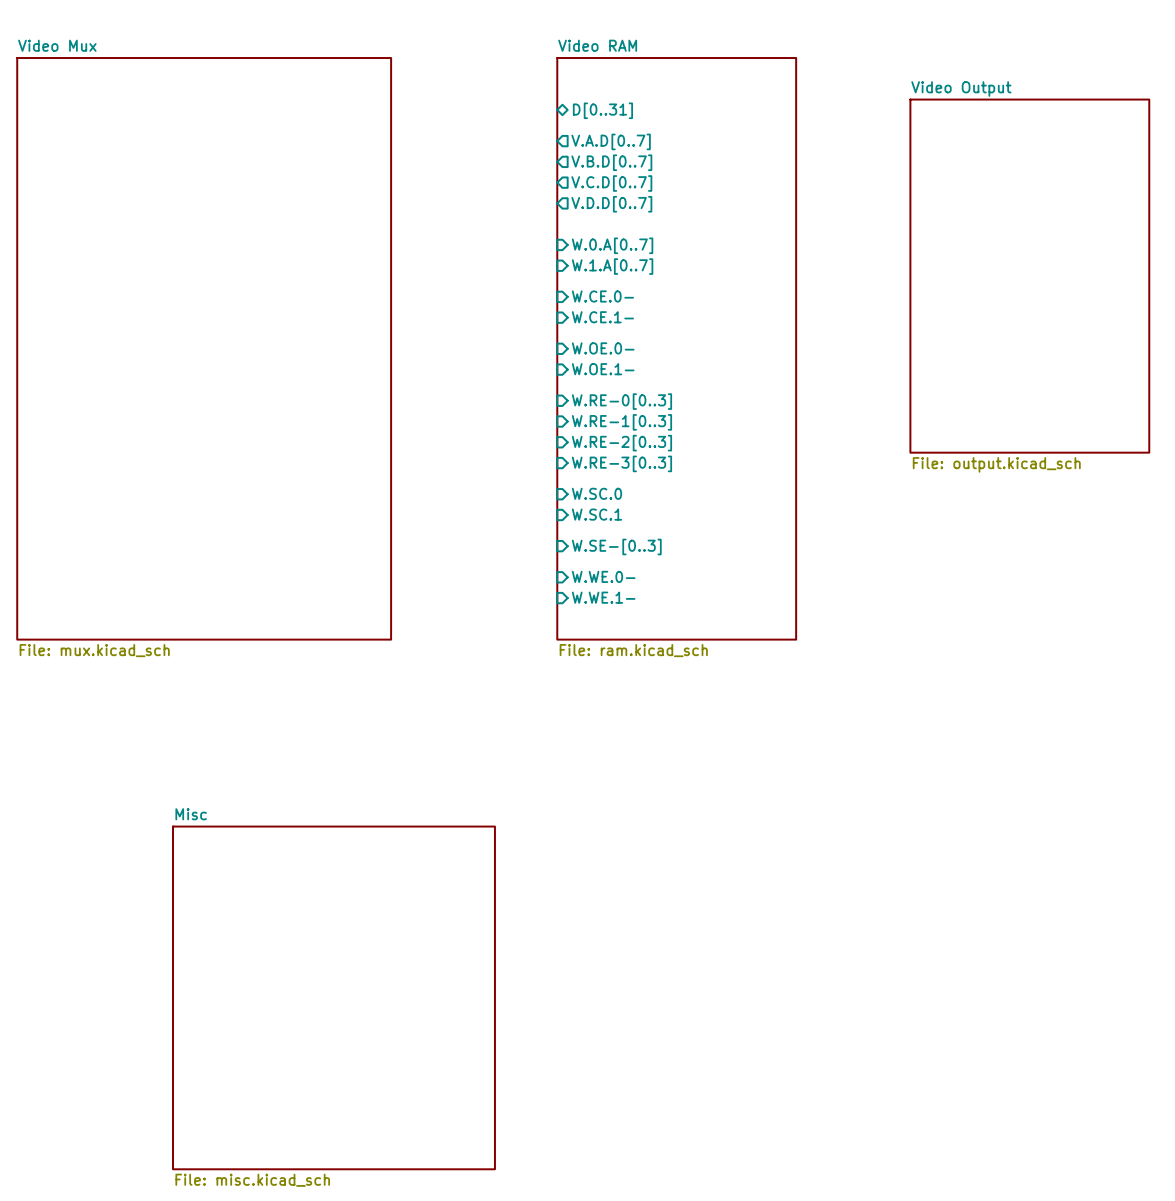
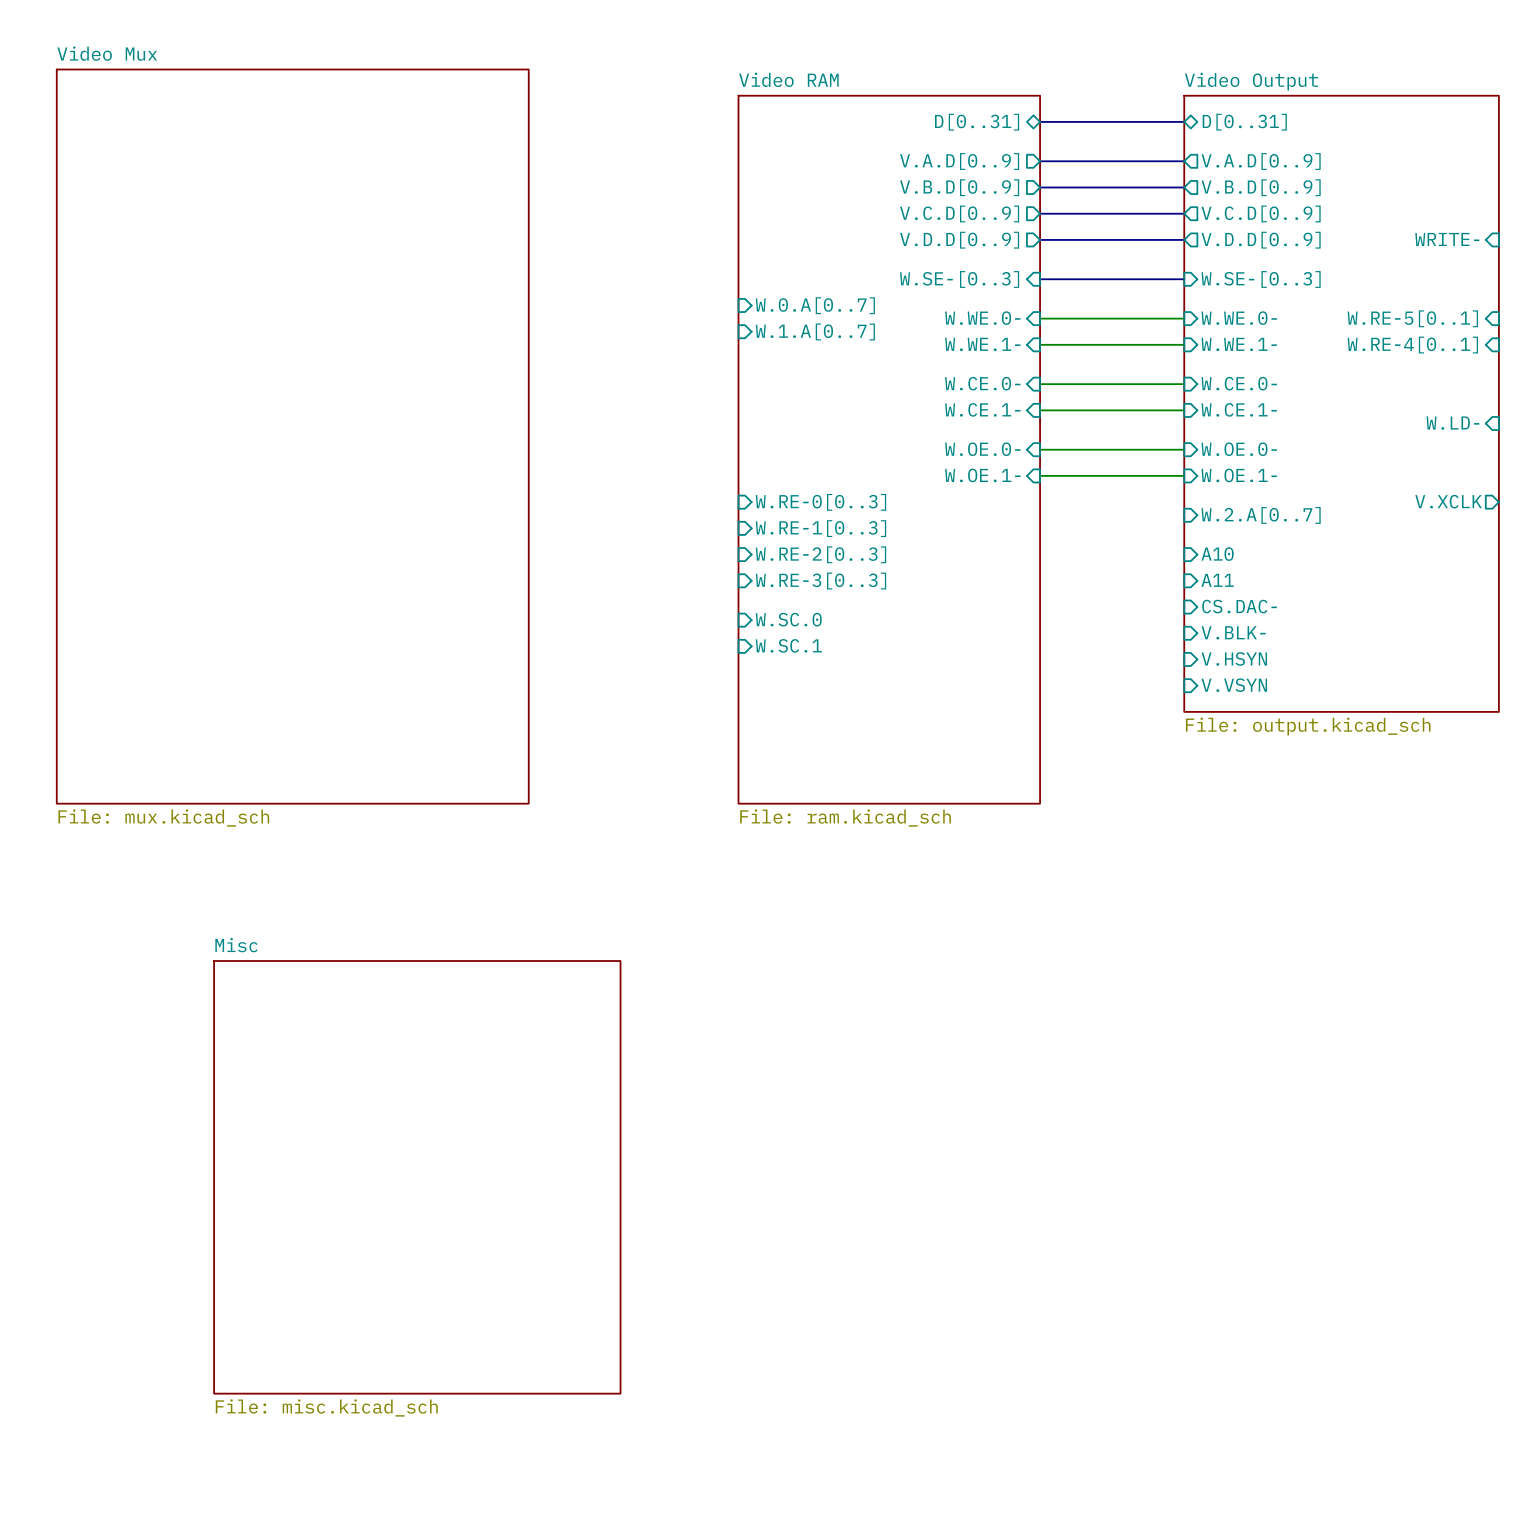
bus: none -> (1040, 121) (1184, 121)
sheet pin: none -> D[0..31] (977, 122)
sheet pin: none -> D[0..31] (1244, 122)
sheet pin: D[0..31] (602, 110) -> none
bus: none -> (1040, 161) (1184, 161)
sheet pin: none -> V.A.D[0..9] (959, 161)
sheet pin: none -> V.A.D[0..9] (1261, 161)
sheet pin: V.A.D[0..7] (611, 141) -> none
bus: none -> (1040, 187) (1184, 187)
sheet pin: none -> V.B.D[0..9] (959, 187)
sheet pin: none -> V.B.D[0..9] (1261, 187)
sheet pin: V.B.D[0..7] (611, 162) -> none
bus: none -> (1040, 213) (1184, 213)
sheet pin: none -> V.C.D[0..9] (959, 213)
sheet pin: none -> V.C.D[0..9] (1261, 213)
sheet pin: V.C.D[0..7] (611, 183) -> none
sheet pin: none -> WRITE- (1447, 239)
sheet pin: none -> V.D.D[0..9] (959, 240)
bus: none -> (1040, 239) (1184, 239)
sheet pin: none -> V.D.D[0..9] (1261, 240)
sheet pin: V.D.D[0..7] (611, 204) -> none
bus: none -> (1040, 279) (1184, 279)
sheet pin: none -> W.SE-[0..3] (959, 279)
sheet pin: none -> W.SE-[0..3] (1261, 279)
sheet pin: none -> W.WE.0- (982, 318)
sheet pin: none -> W.WE.0- (1239, 318)
wire: none -> (1040, 318) (1184, 318)
sheet pin: none -> W.RE-5[0..1] (1412, 318)
sheet pin: none -> W.WE.1- (982, 344)
sheet pin: none -> W.WE.1- (1239, 344)
wire: none -> (1040, 344) (1184, 344)
sheet Video Output: File: output.kicad_sch (1029, 276) -> none
sheet pin: none -> W.RE-4[0..1] (1412, 345)
sheet pin: W.CE.0- (602, 296) -> none
sheet pin: none -> W.CE.0- (982, 383)
sheet pin: none -> W.CE.0- (1239, 383)
wire: none -> (1040, 384) (1184, 384)
sheet pin: W.CE.1- (602, 317) -> none
sheet Video Output: none -> File: output.kicad_sch (1341, 403)
sheet pin: none -> W.CE.1- (982, 409)
sheet pin: none -> W.CE.1- (1239, 409)
wire: none -> (1040, 410) (1184, 410)
sheet pin: none -> W.LD- (1452, 423)
sheet pin: W.OE.0- (603, 348) -> none
sheet Video RAM: File: ram.kicad_sch (676, 348) -> none
sheet pin: none -> W.OE.0- (982, 449)
sheet pin: none -> W.OE.0- (1239, 449)
sheet Video RAM: none -> File: ram.kicad_sch (889, 449)
wire: none -> (1040, 449) (1184, 449)
sheet pin: W.OE.1- (603, 369) -> none
sheet pin: none -> W.OE.1- (982, 475)
wire: none -> (1040, 475) (1184, 475)
sheet pin: none -> W.OE.1- (1239, 475)
sheet pin: none -> V.XCLK (1448, 501)
sheet pin: none -> W.2.A[0..7] (1261, 515)
sheet pin: none -> A10 (1217, 554)
sheet pin: none -> A11 (1217, 580)
sheet pin: none -> CS.DAC- (1239, 606)
sheet pin: none -> V.BLK- (1233, 632)
sheet pin: none -> V.HSYN (1234, 658)
sheet pin: none -> V.VSYN (1234, 685)
sheet pin: W.SE-[0..3] (616, 546) -> none
sheet pin: W.WE.0- (603, 576) -> none
sheet pin: W.WE.1- (603, 597) -> none
sheet Misc position: (333, 997) -> (417, 1177)

